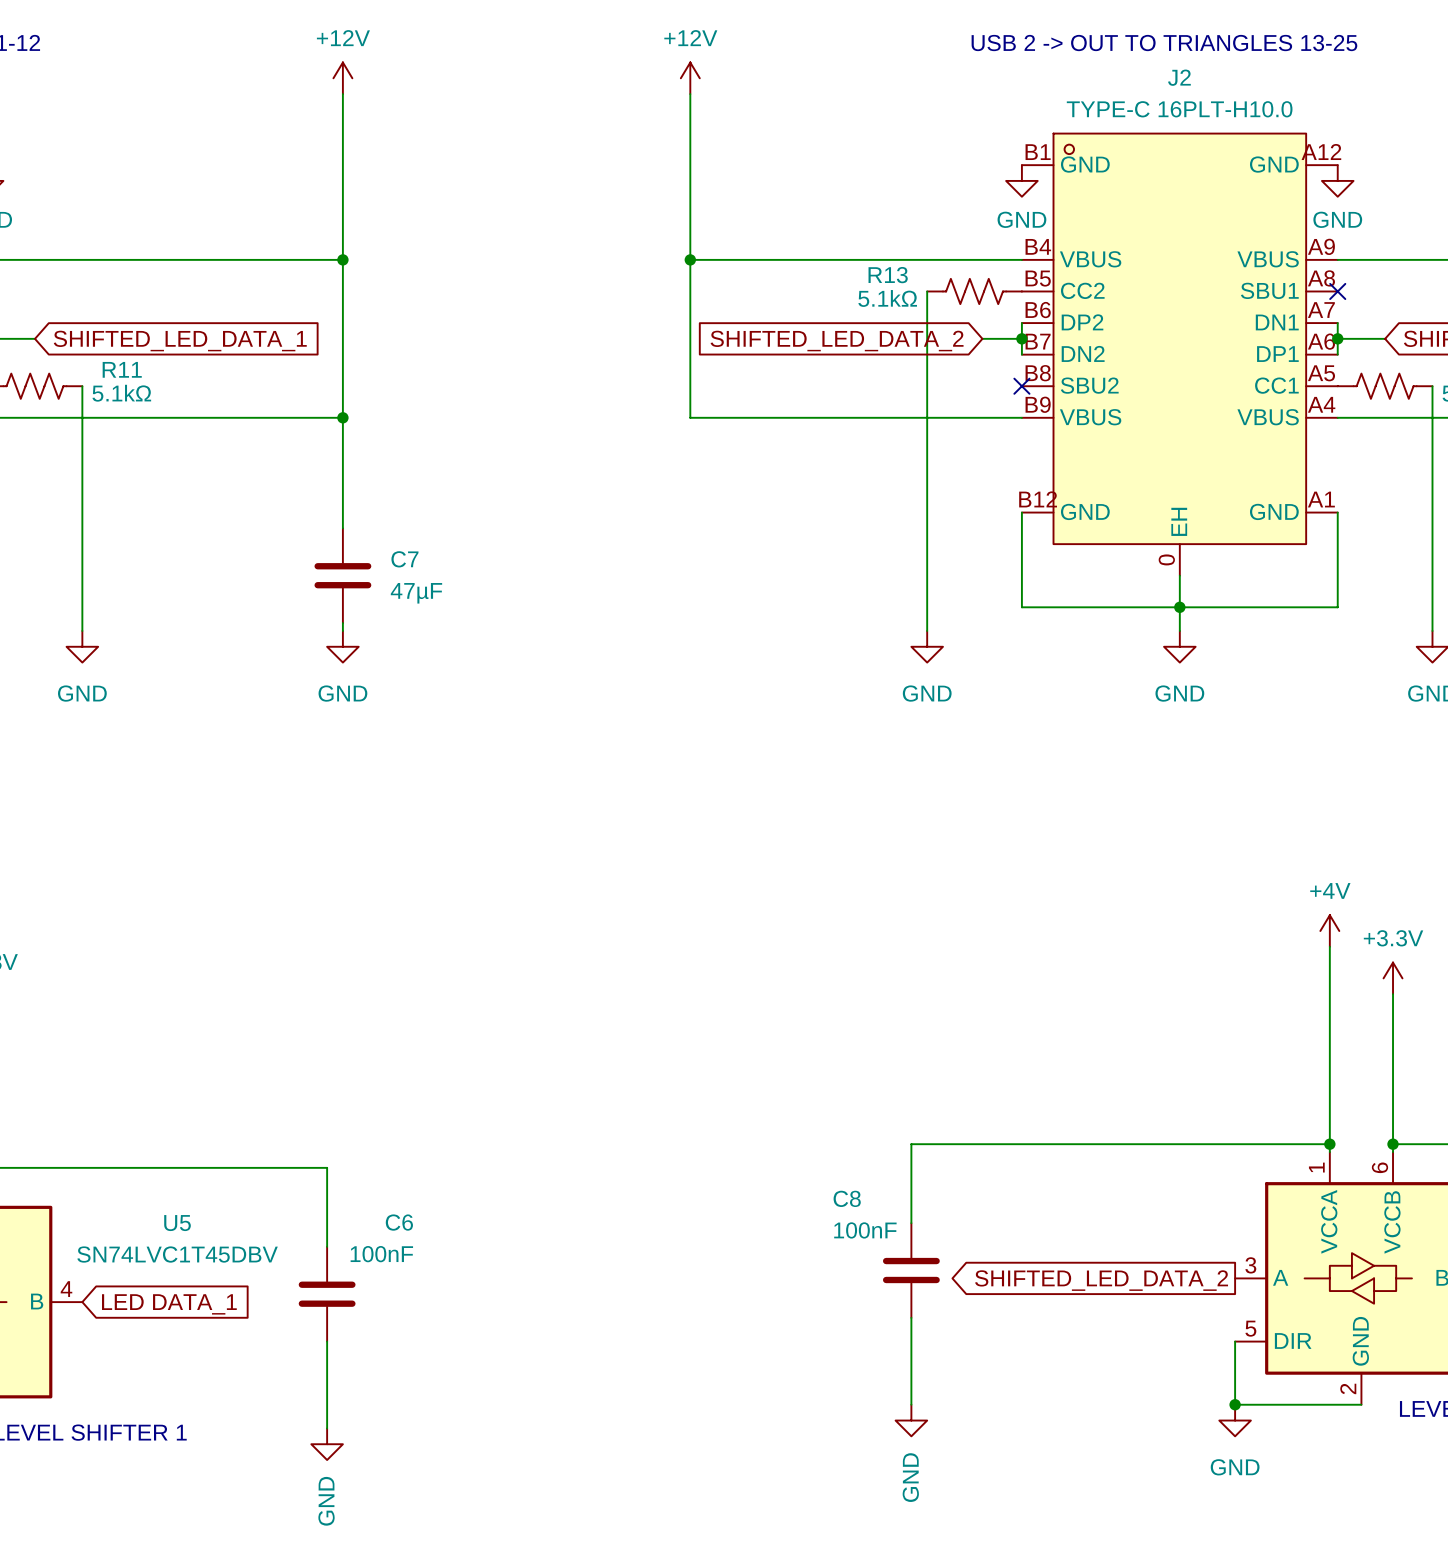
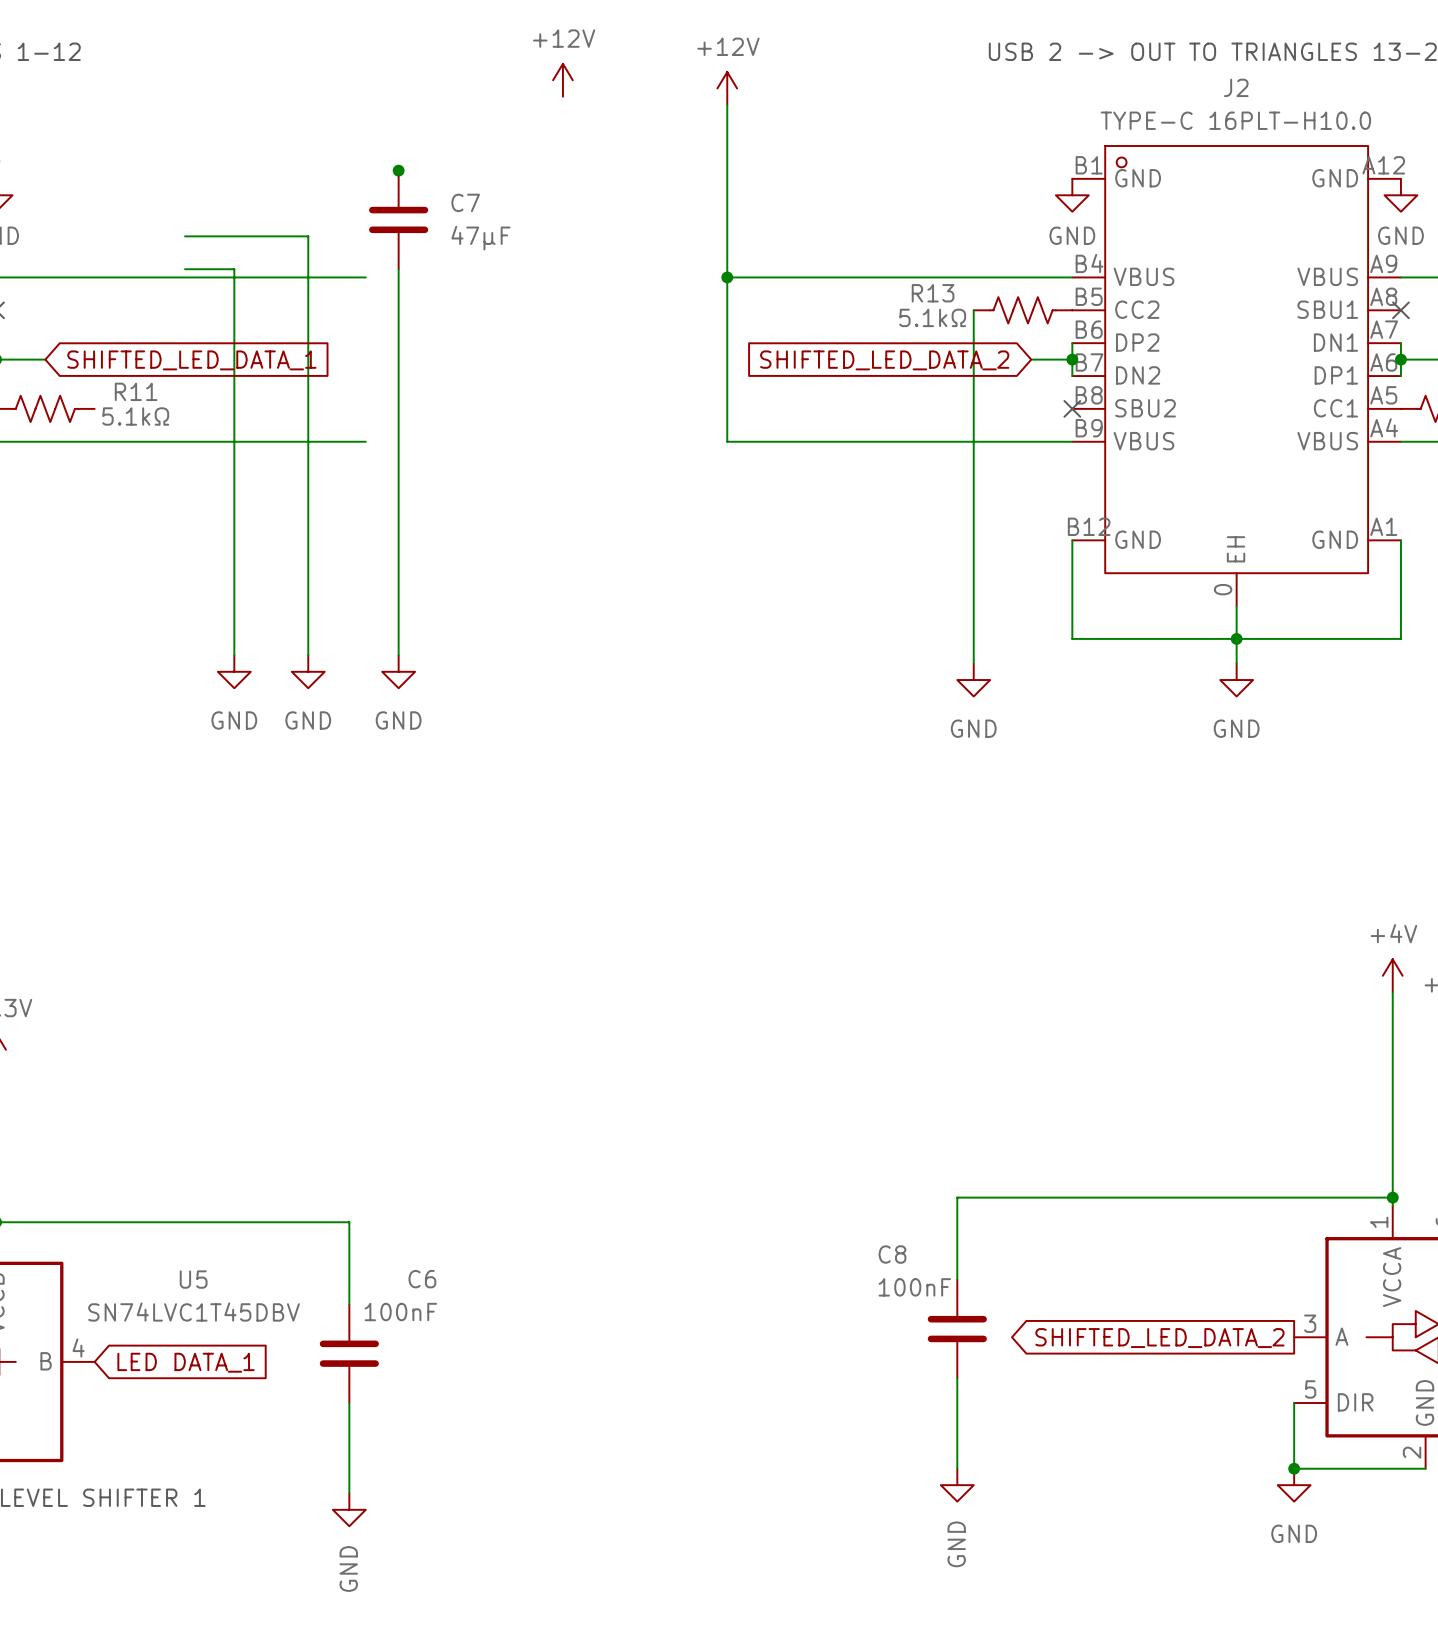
power symbol position: +12V (342, 78) -> +12V (562, 80)
wire: (342, 94) (342, 528) -> none
junction: none -> (398, 170)
wire: none -> (185, 236) (308, 236) (308, 655)
wire: none -> (185, 269) (234, 269) (234, 655)
wire: none -> (398, 269) (398, 655)
junction: (342, 259) -> none
wire: (82, 386) (82, 630) -> none
junction: (342, 417) -> none
C7 position: (342, 575) -> (398, 219)
wire: (342, 623) (342, 630) -> none
power symbol: none -> GND (234, 671)
power symbol: none -> GND (308, 671)
power symbol: none -> GND (398, 671)
power symbol: GND (82, 646) -> none
power symbol: GND (342, 646) -> none

